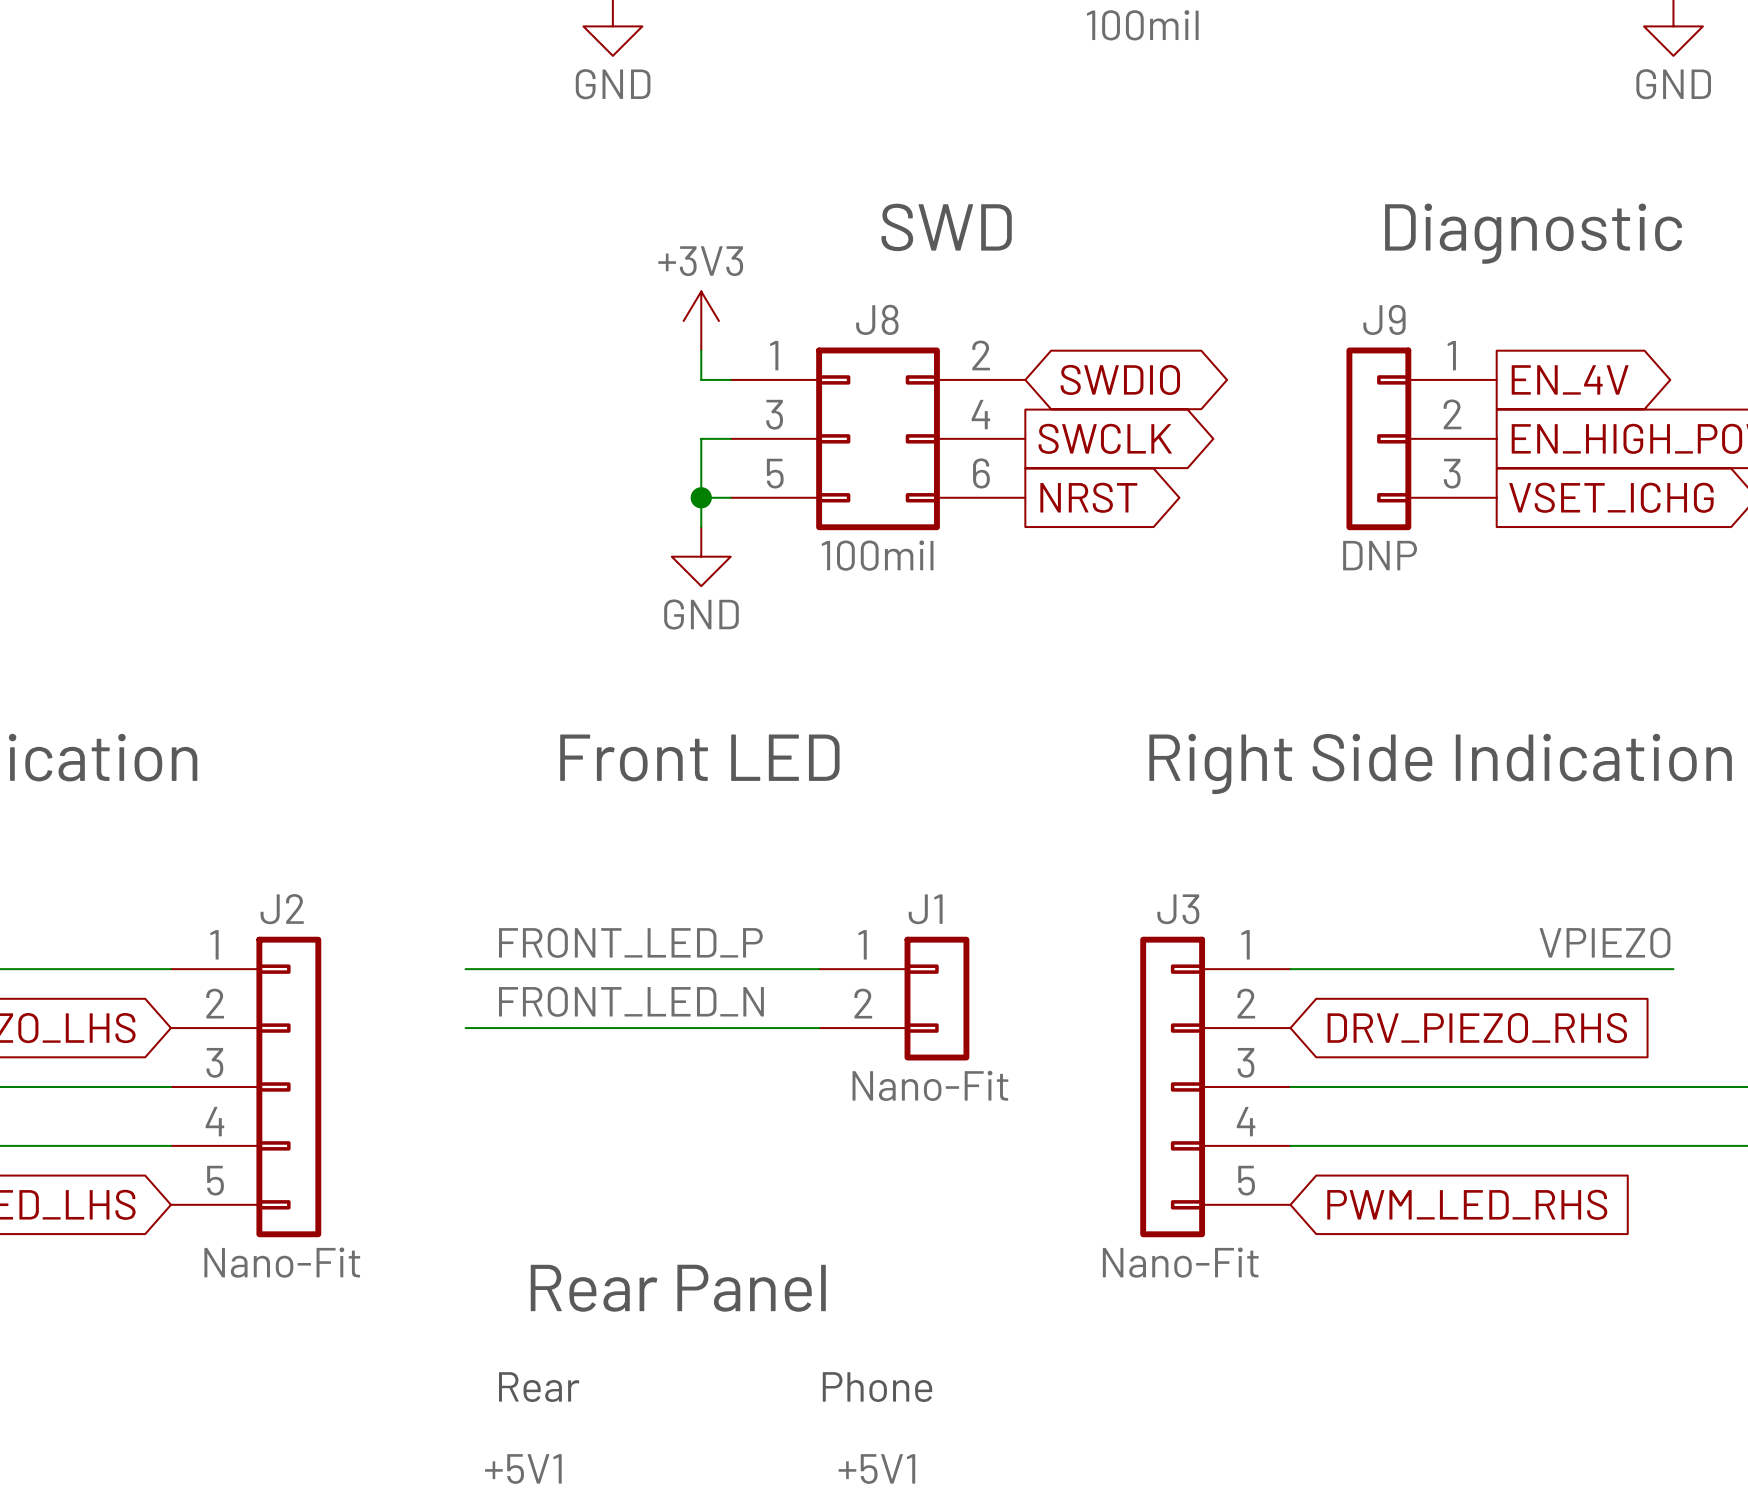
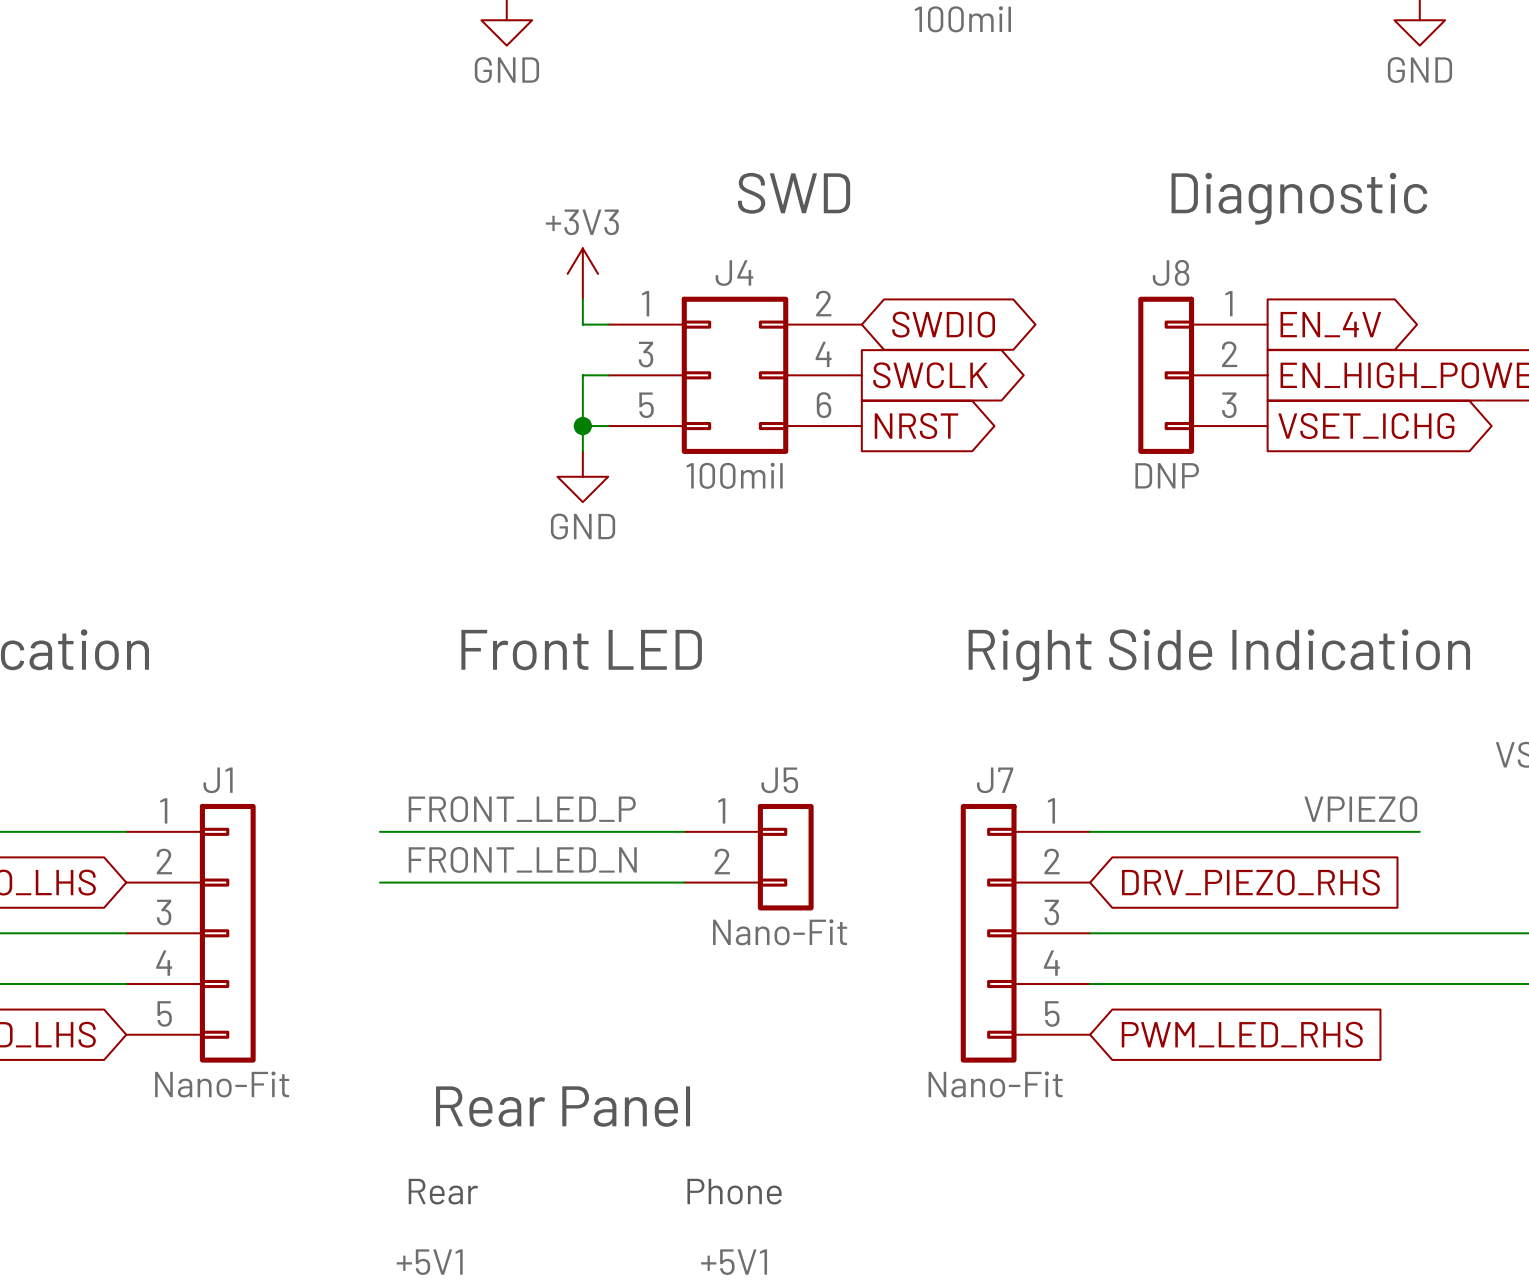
J8 name: J8 (877, 319) -> J4 (734, 273)
J9 name: J9 (1384, 319) -> J8 (1171, 272)
J2 name: J2 (282, 909) -> J1 (218, 780)
J1 name: J1 (925, 909) -> J5 (779, 780)
J3 name: J3 (1178, 909) -> J7 (995, 780)

